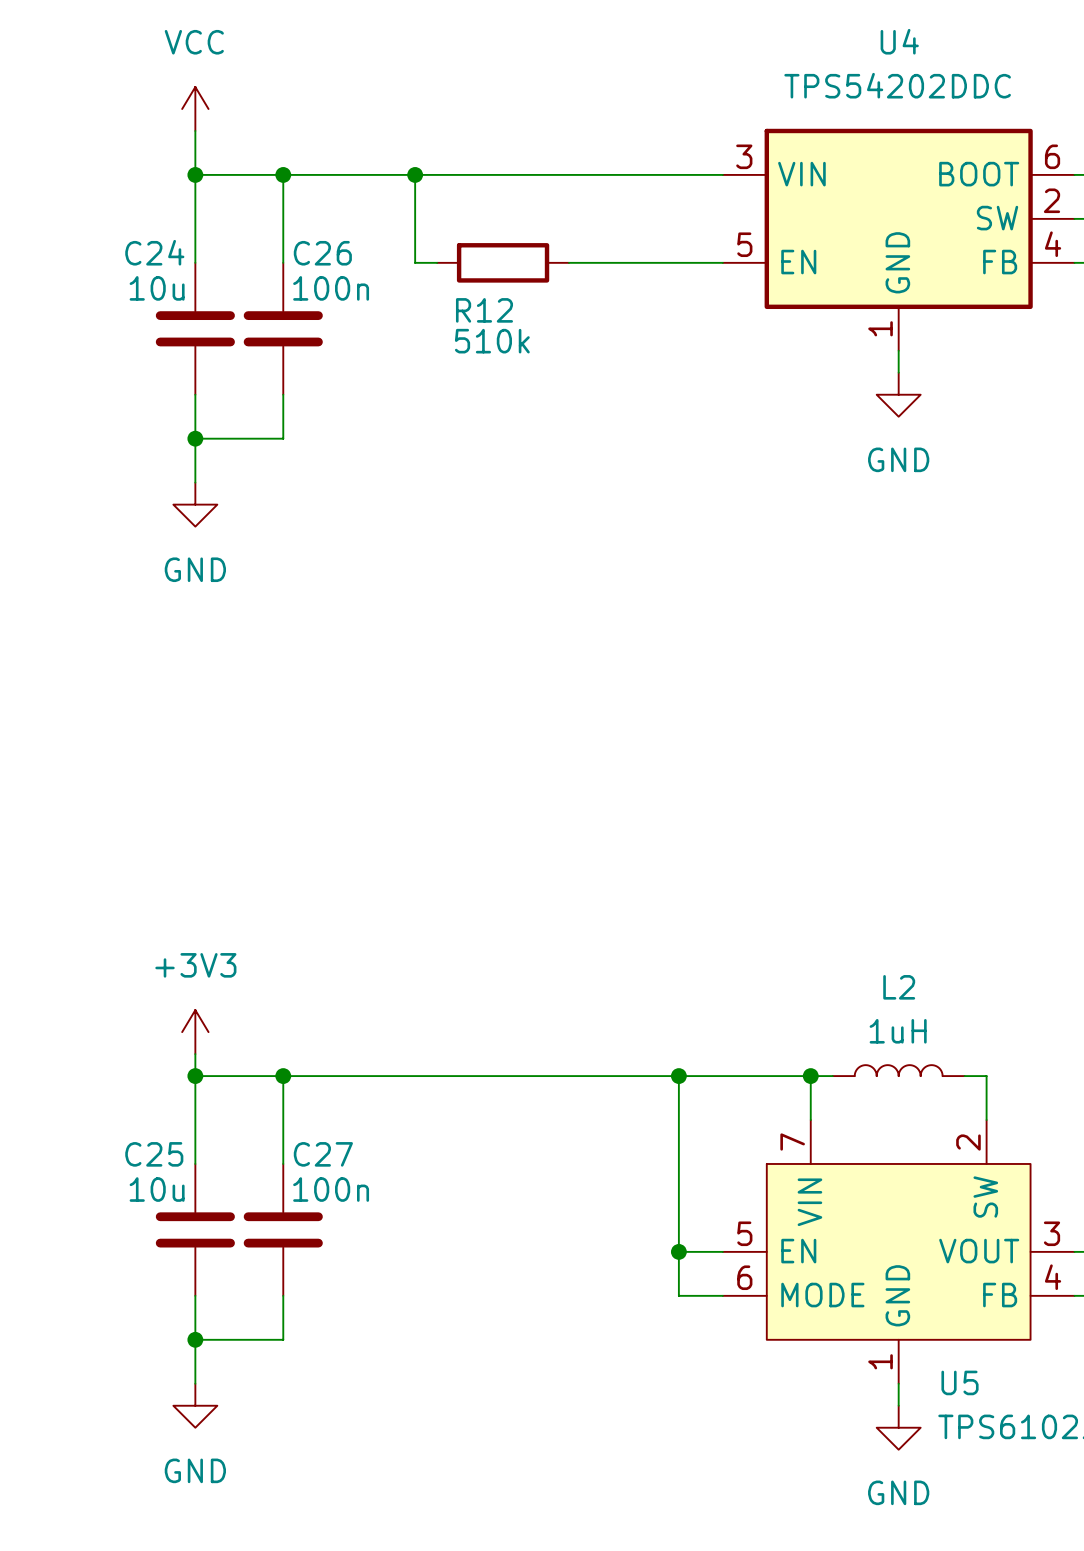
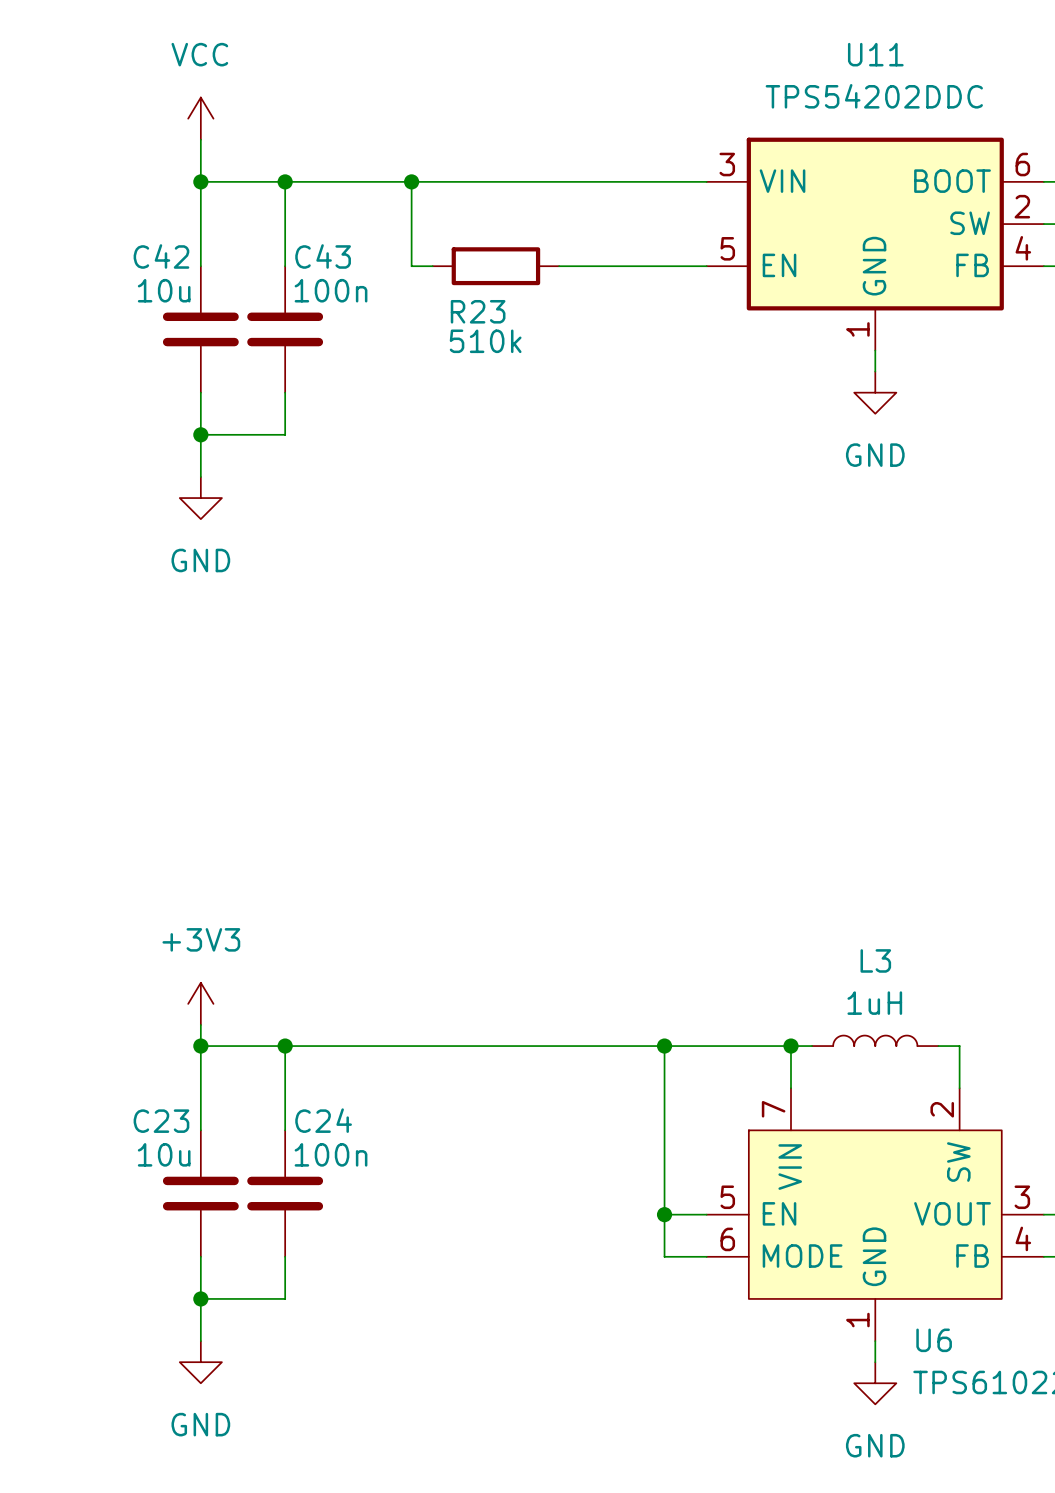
U4 name: U4 (899, 41) -> U11 (875, 54)
C24 name: C24 (154, 252) -> C42 (161, 256)
C26 name: C26 (322, 253) -> C43 (323, 256)
R12 name: R12 (484, 310) -> R23 (478, 311)
L2 name: L2 (899, 987) -> L3 (875, 960)
C25 name: C25 (154, 1154) -> C23 (161, 1121)
C27 name: C27 (323, 1154) -> C24 (323, 1120)
U5 name: U5 (960, 1382) -> U6 (934, 1340)

